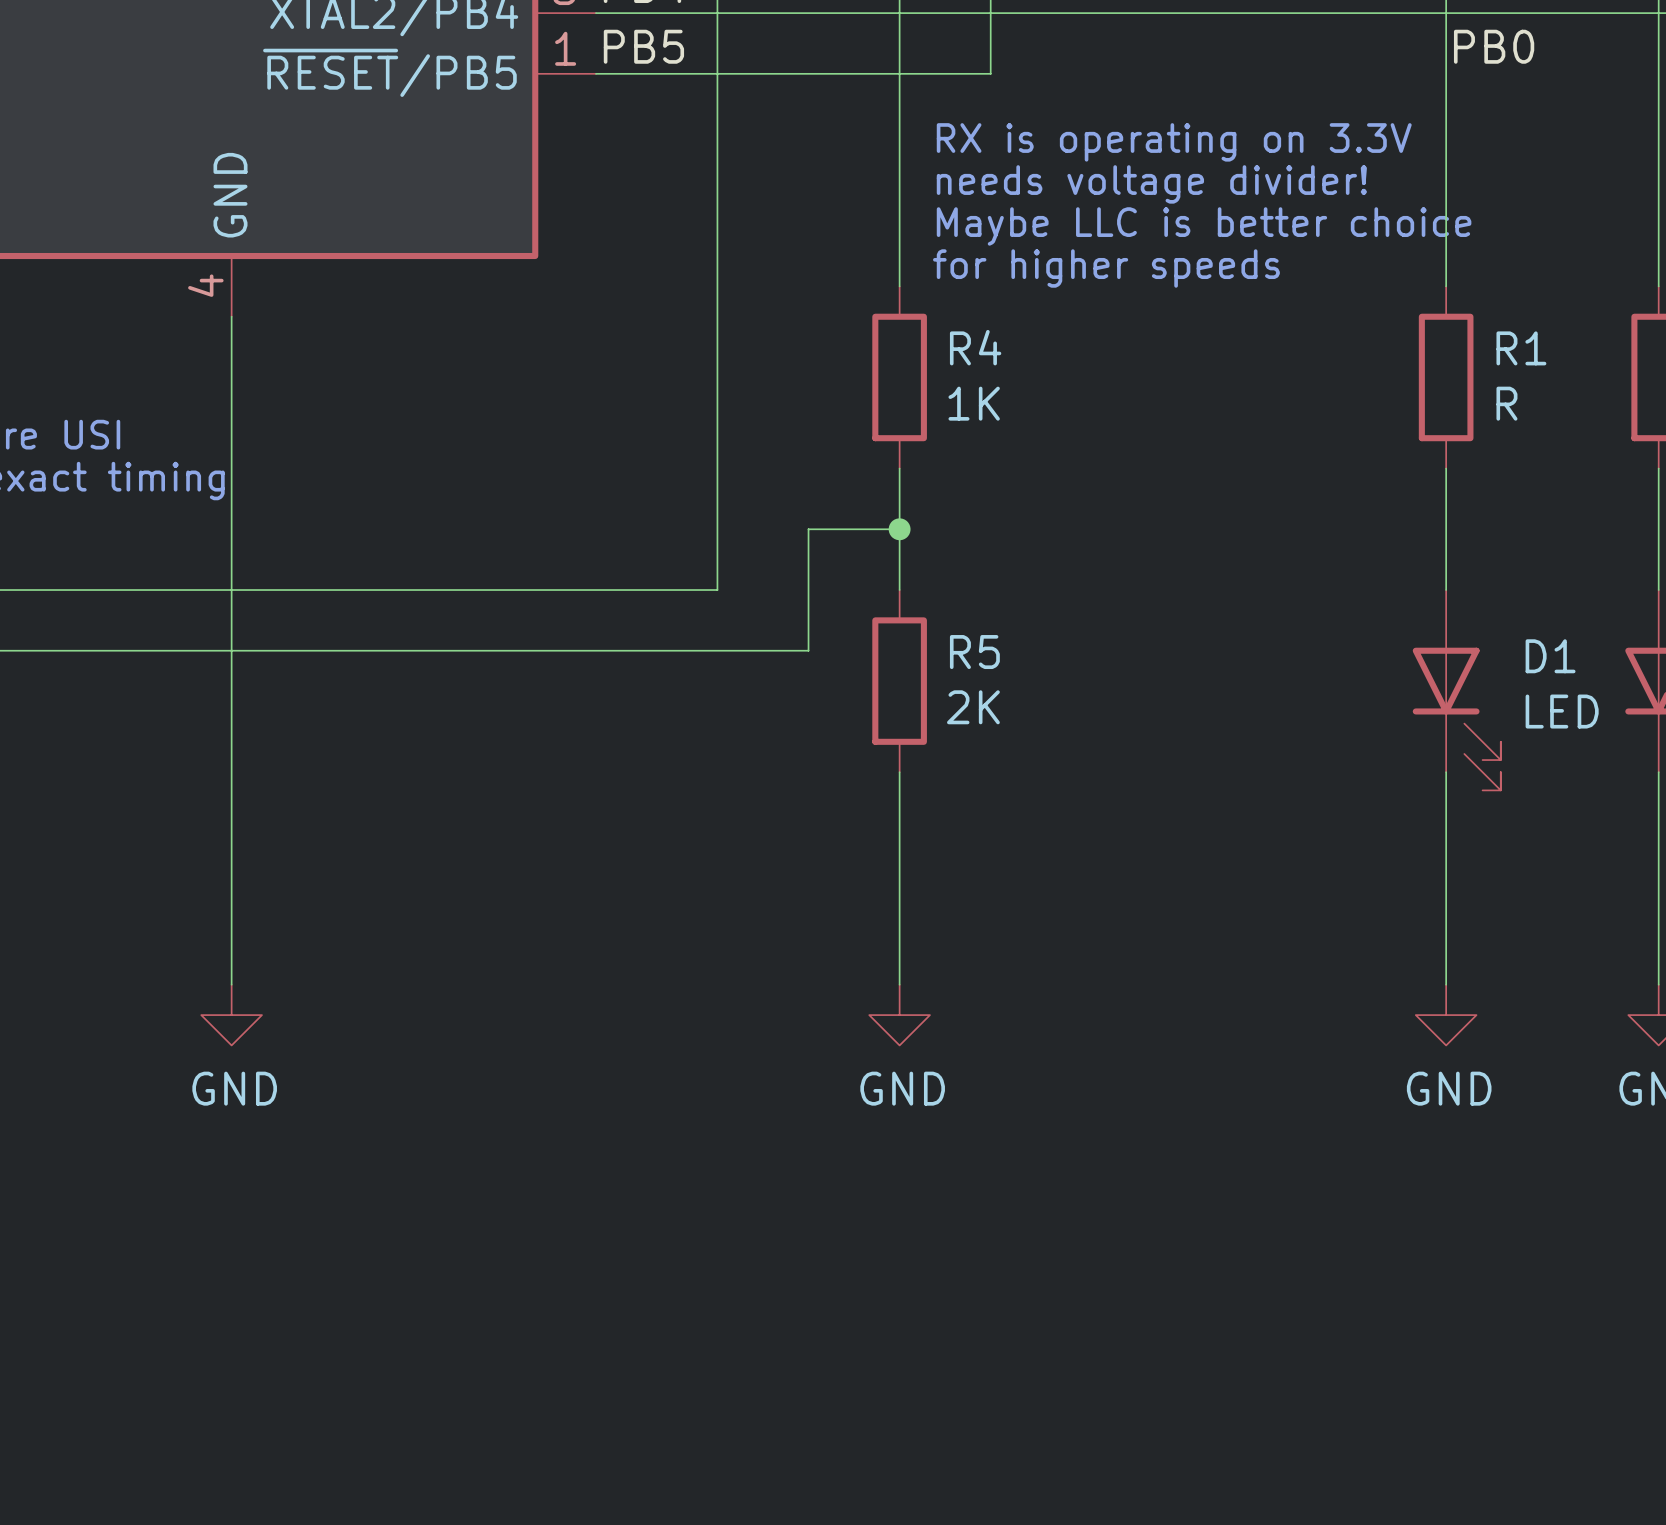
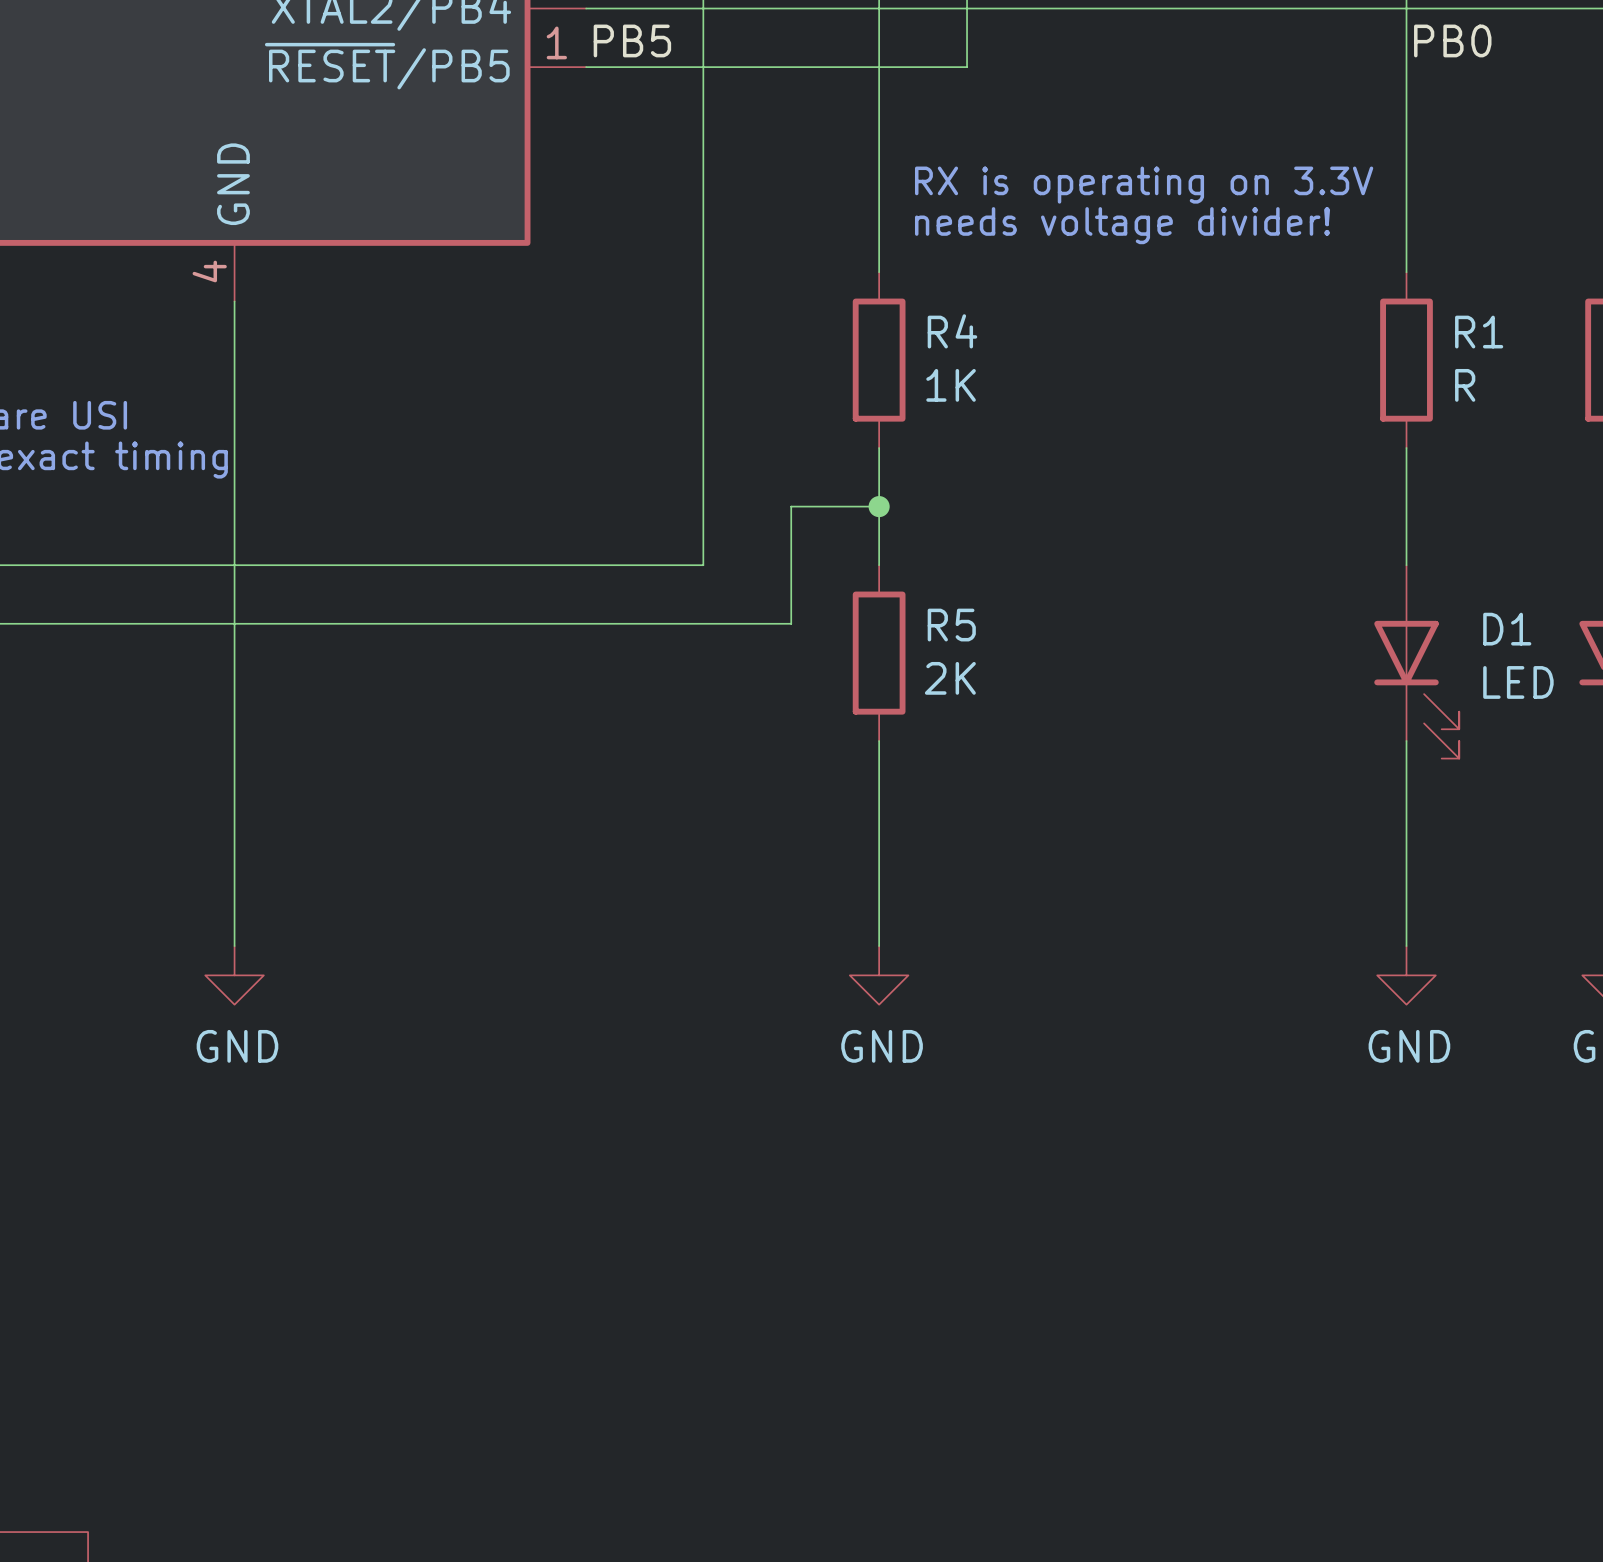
text: RX is operating on 3.3V (1174, 142) -> none
text: needs voltage divider! (1151, 184) -> RX is operating on 3.3V (1144, 185)
text: Maybe LLC is better choice (1204, 226) -> needs voltage divider! (1122, 225)
text: for higher speeds (1106, 268) -> none

